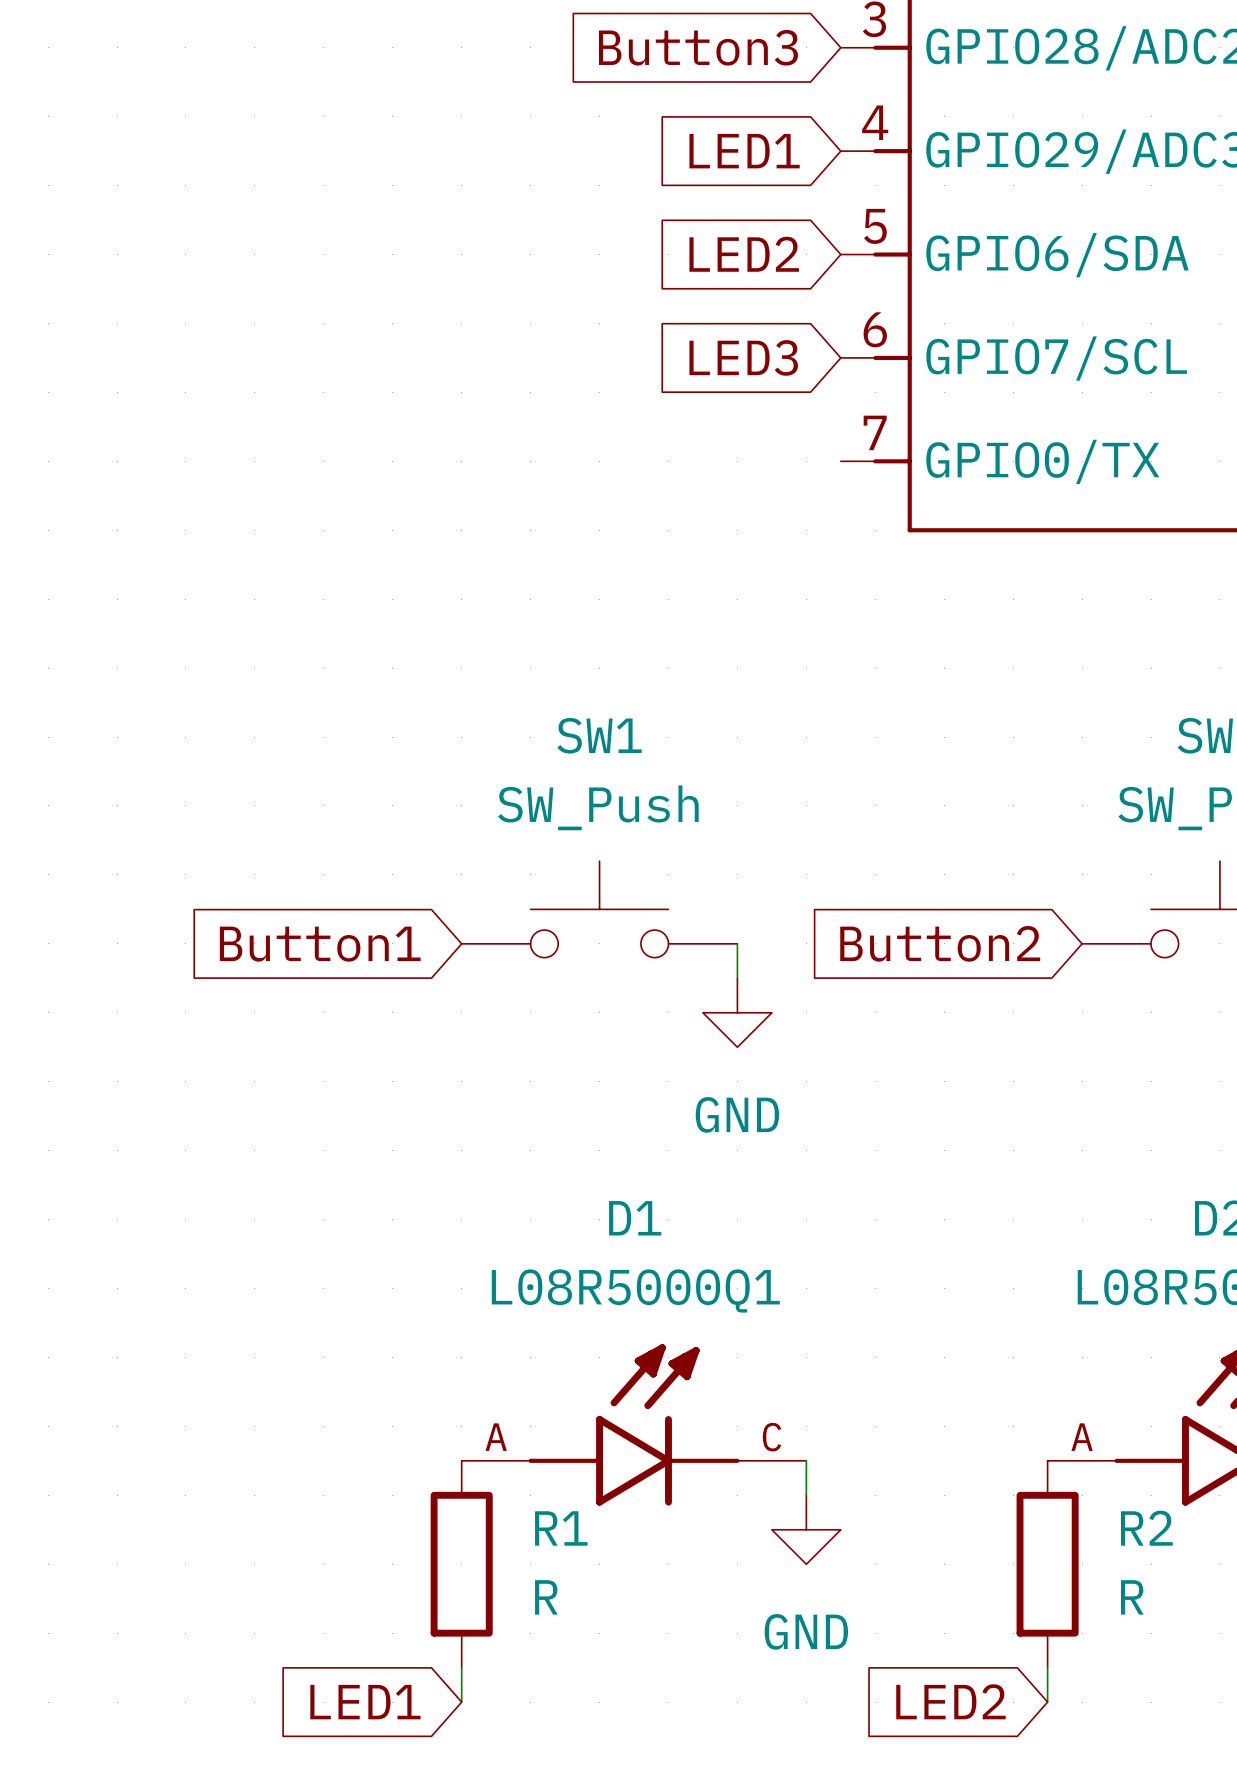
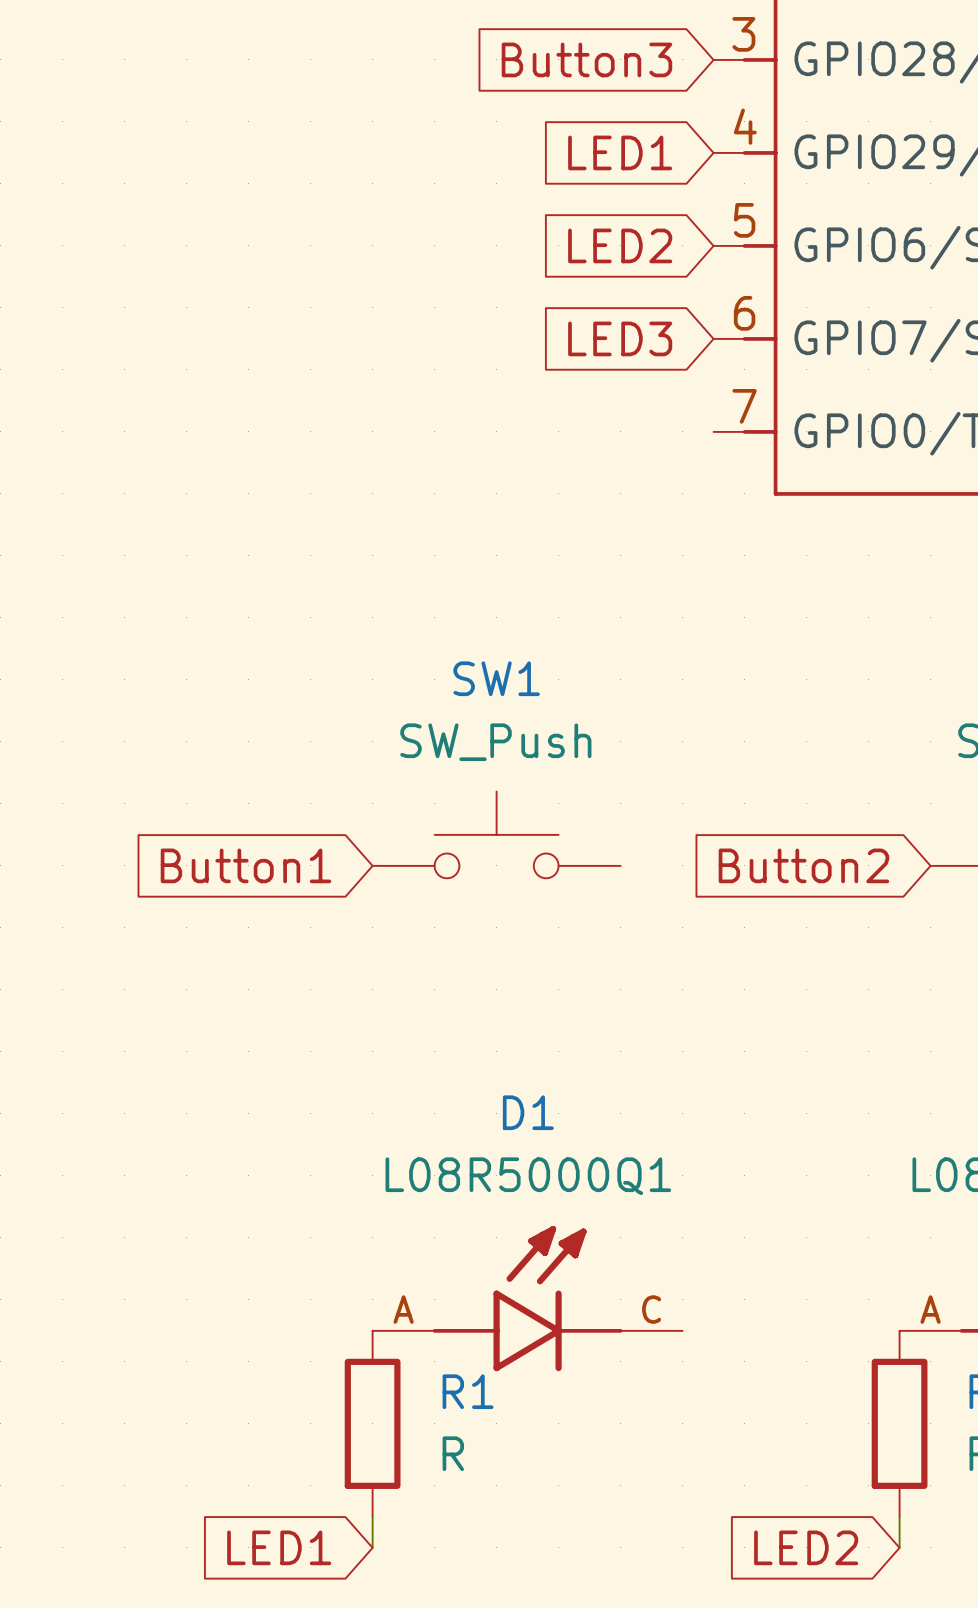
wire: (737, 943) (737, 978) -> none
power symbol: GND (737, 1012) -> none
wire: (806, 1460) (806, 1495) -> none
power symbol: GND (806, 1529) -> none

